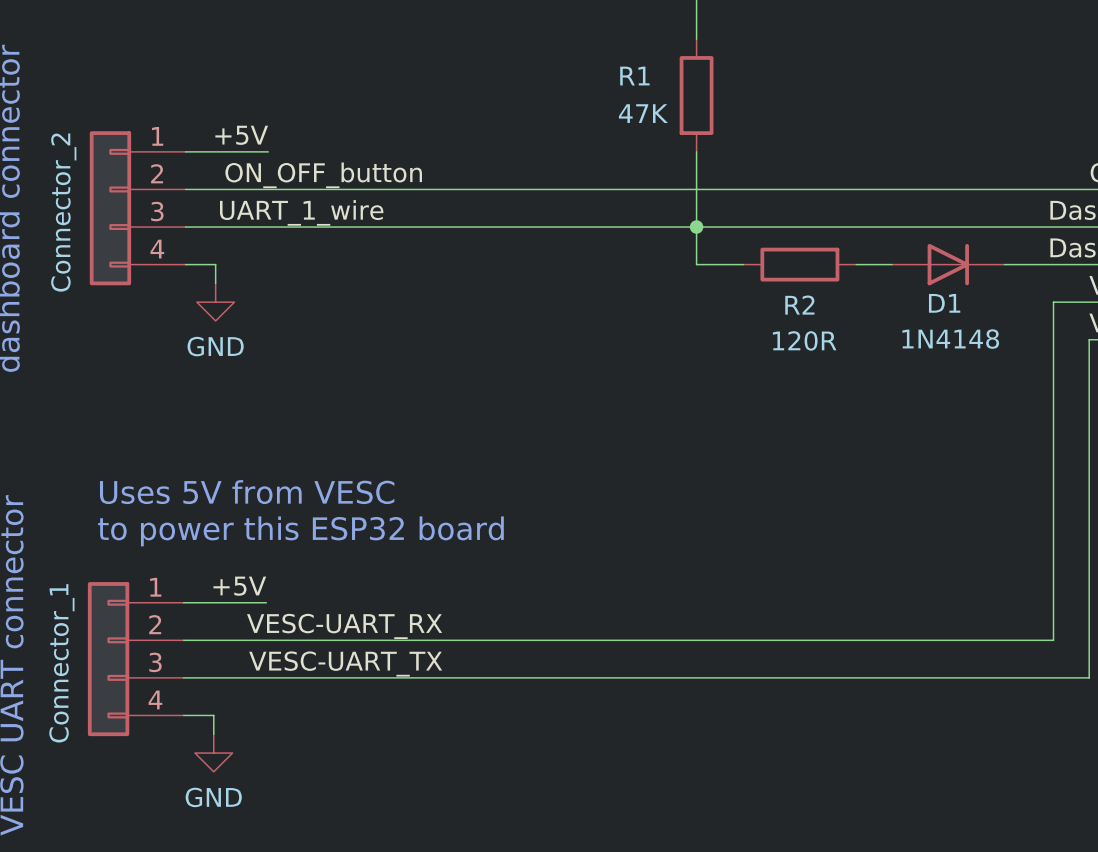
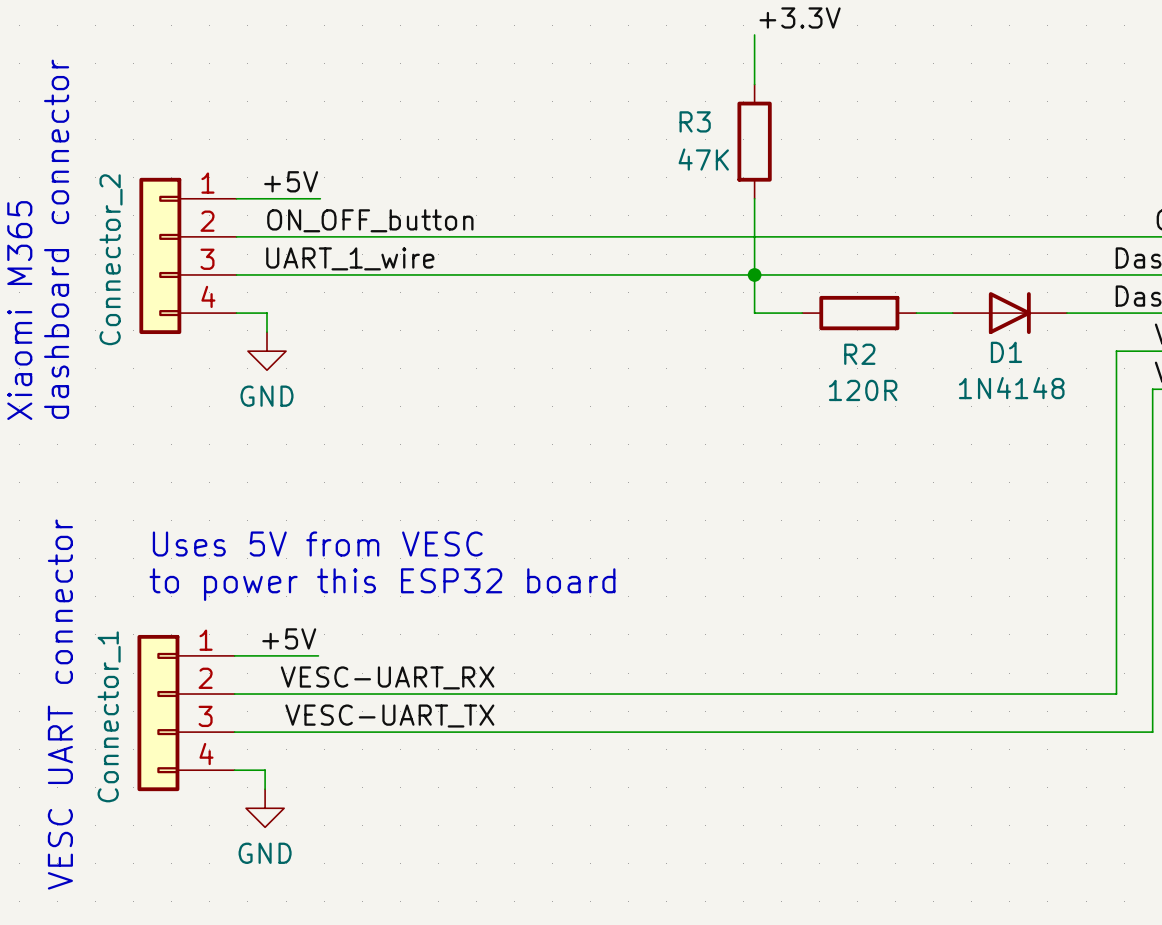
R1 name: R1 (634, 76) -> R3 (695, 121)

